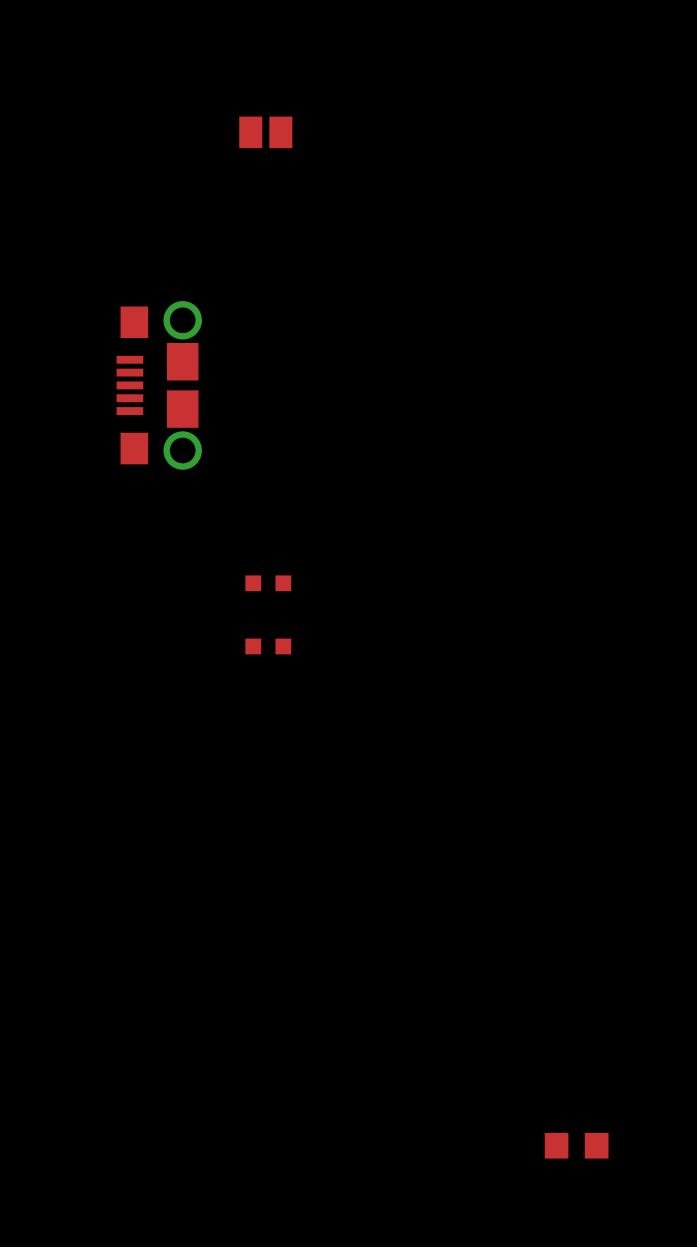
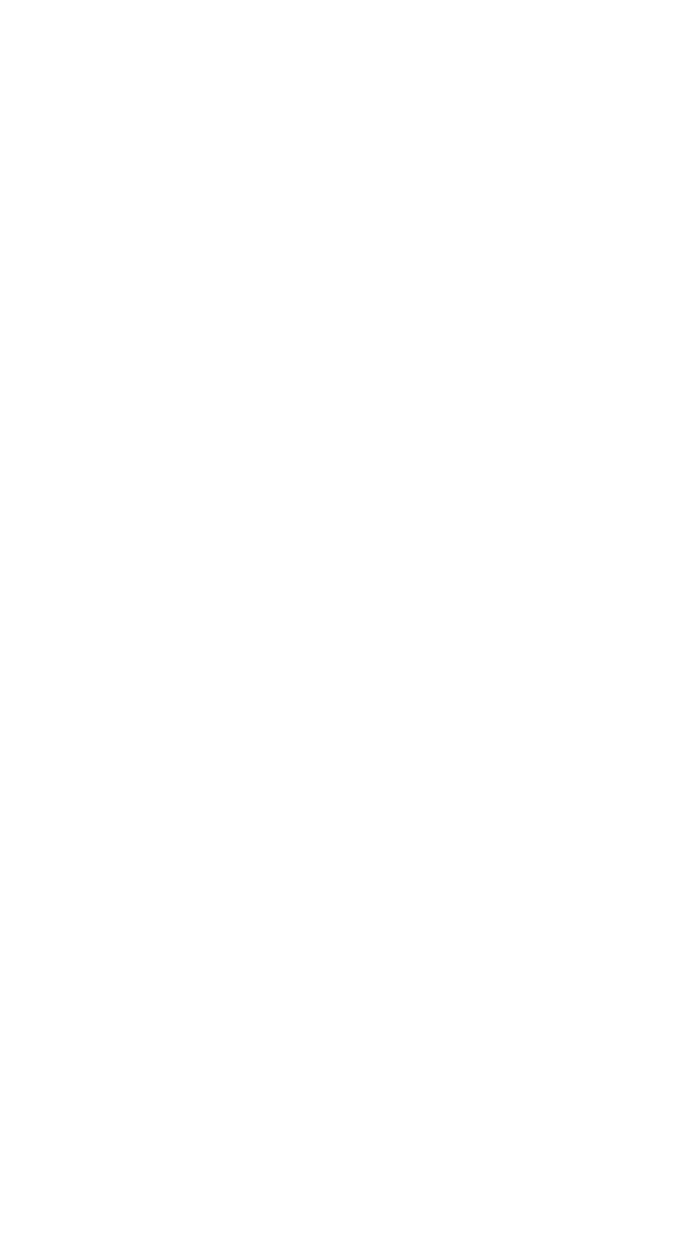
part: (265, 132) -> none
part: (159, 385) -> none
part: (268, 583) -> none
part: (268, 646) -> none
part: (576, 1145) -> none

